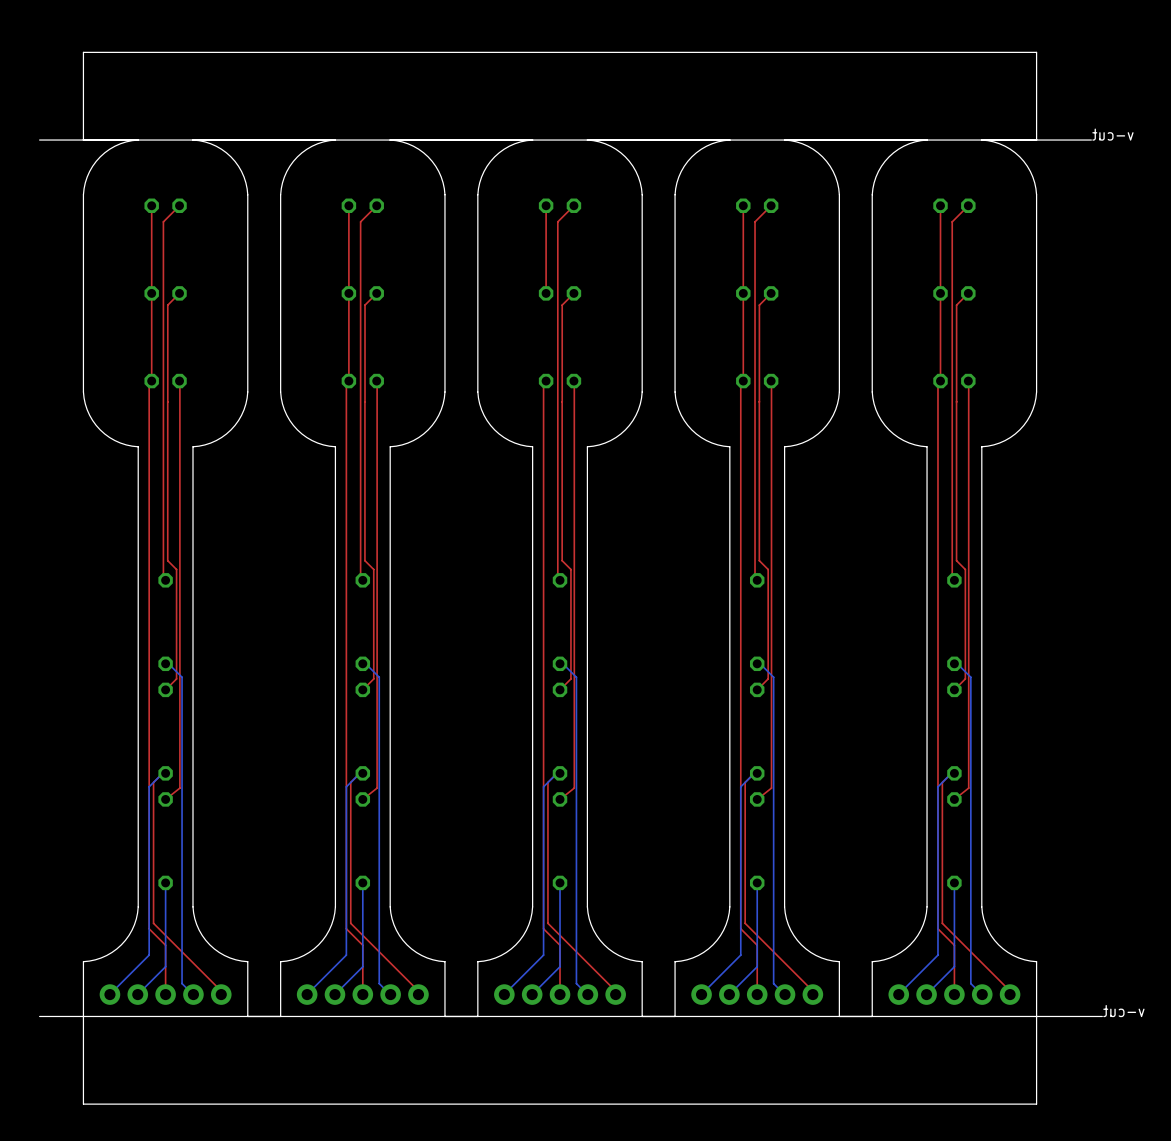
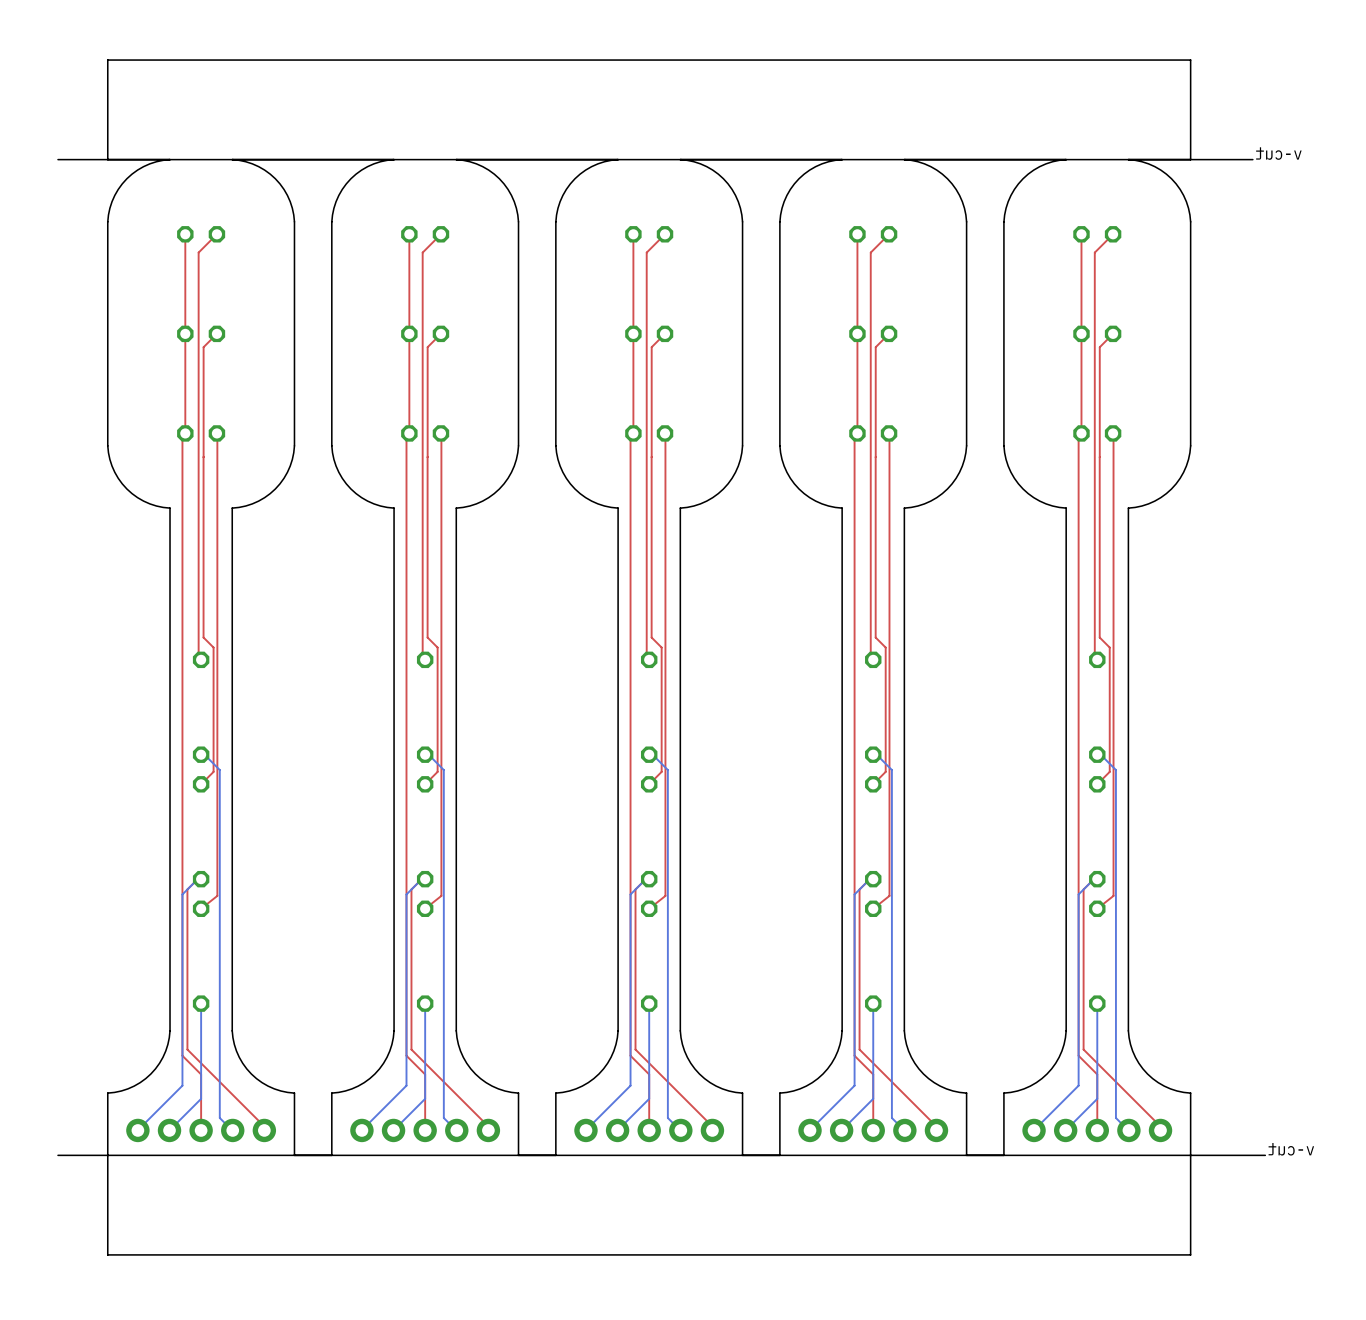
top track: none -> (633, 333) (633, 433)

